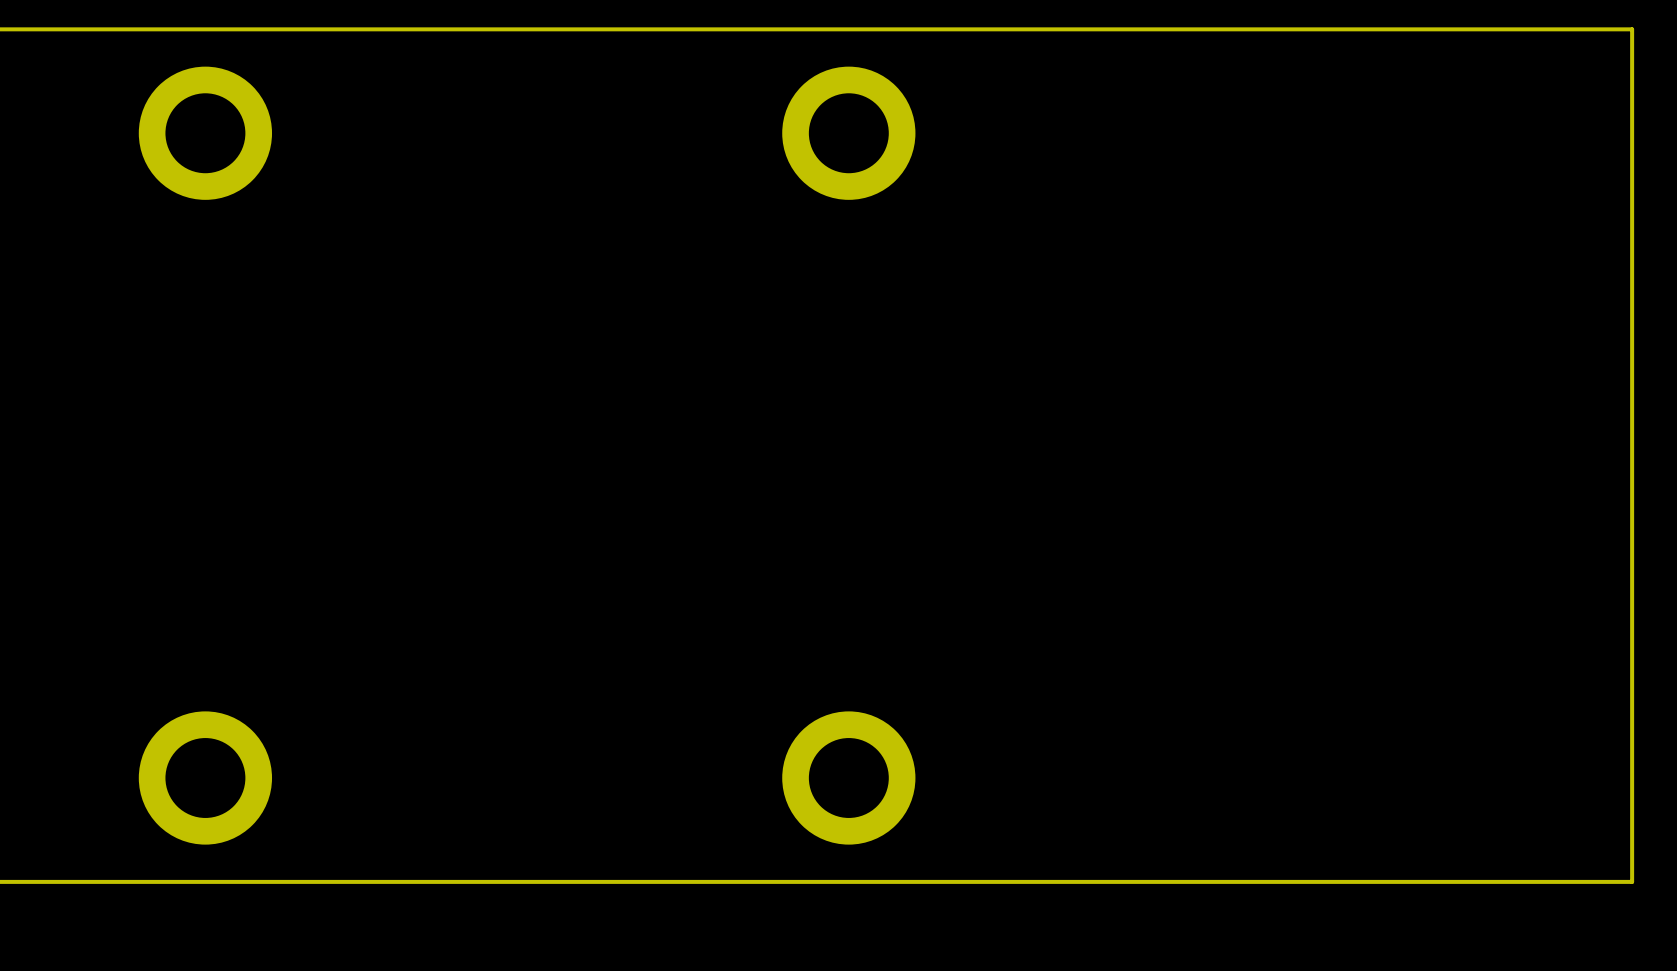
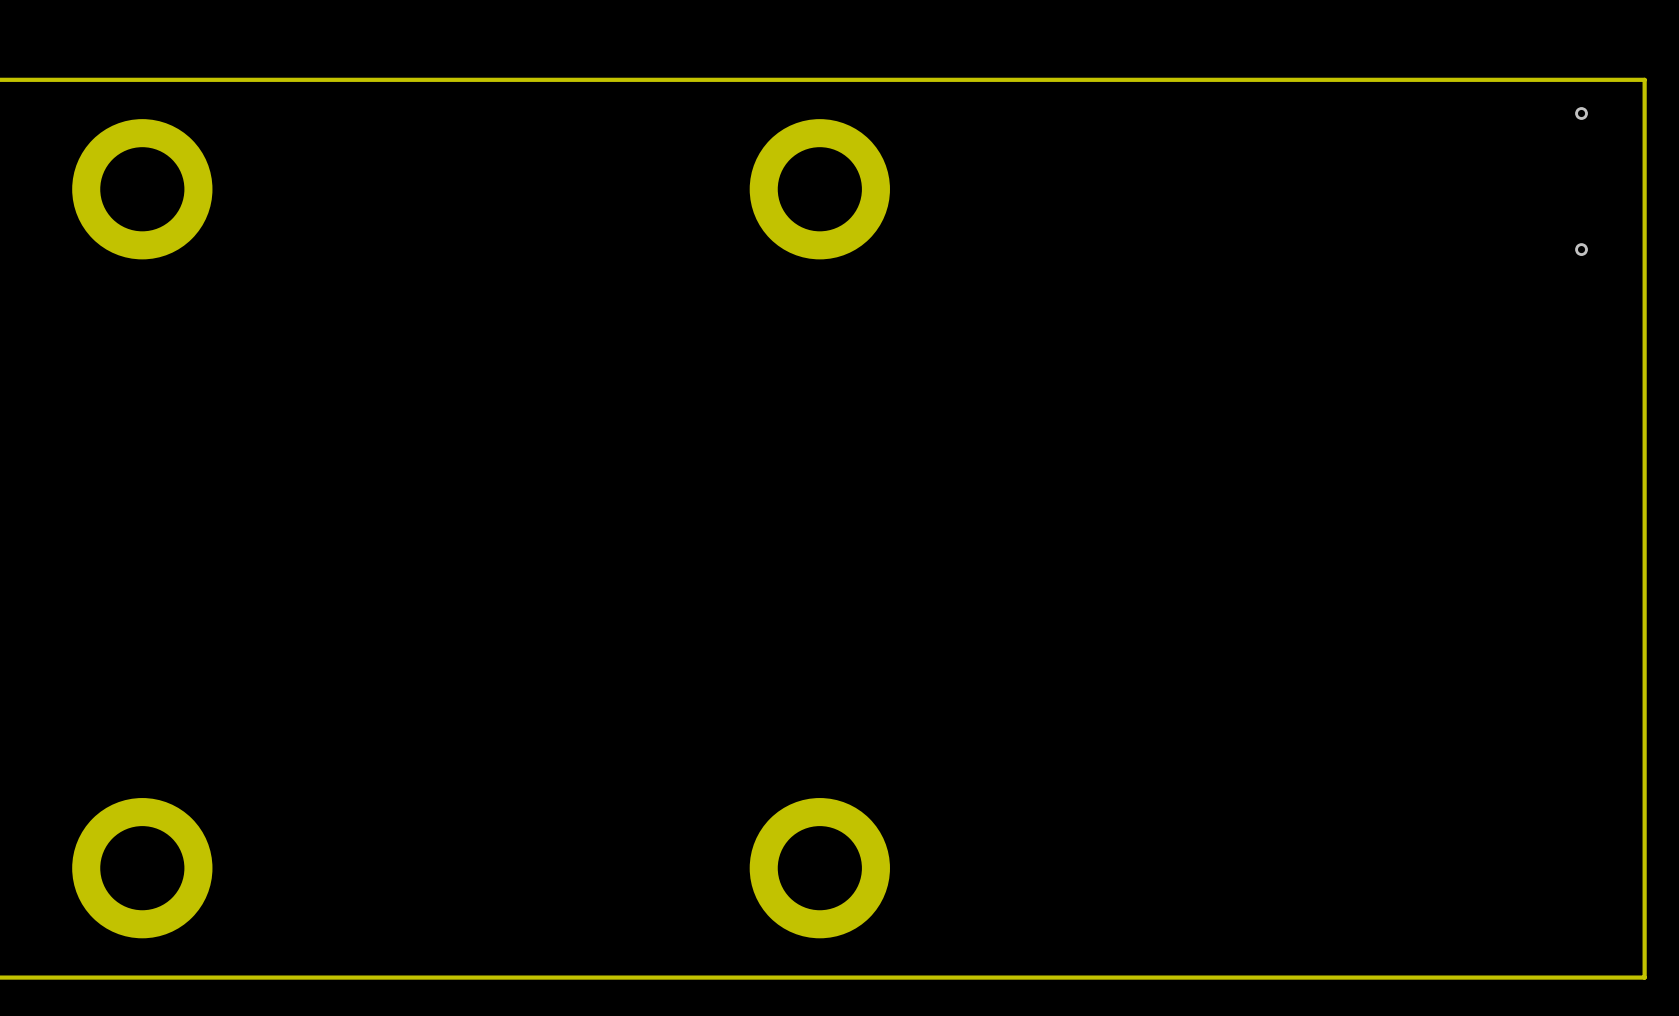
via: none -> (1581, 113)
via: none -> (1581, 249)

